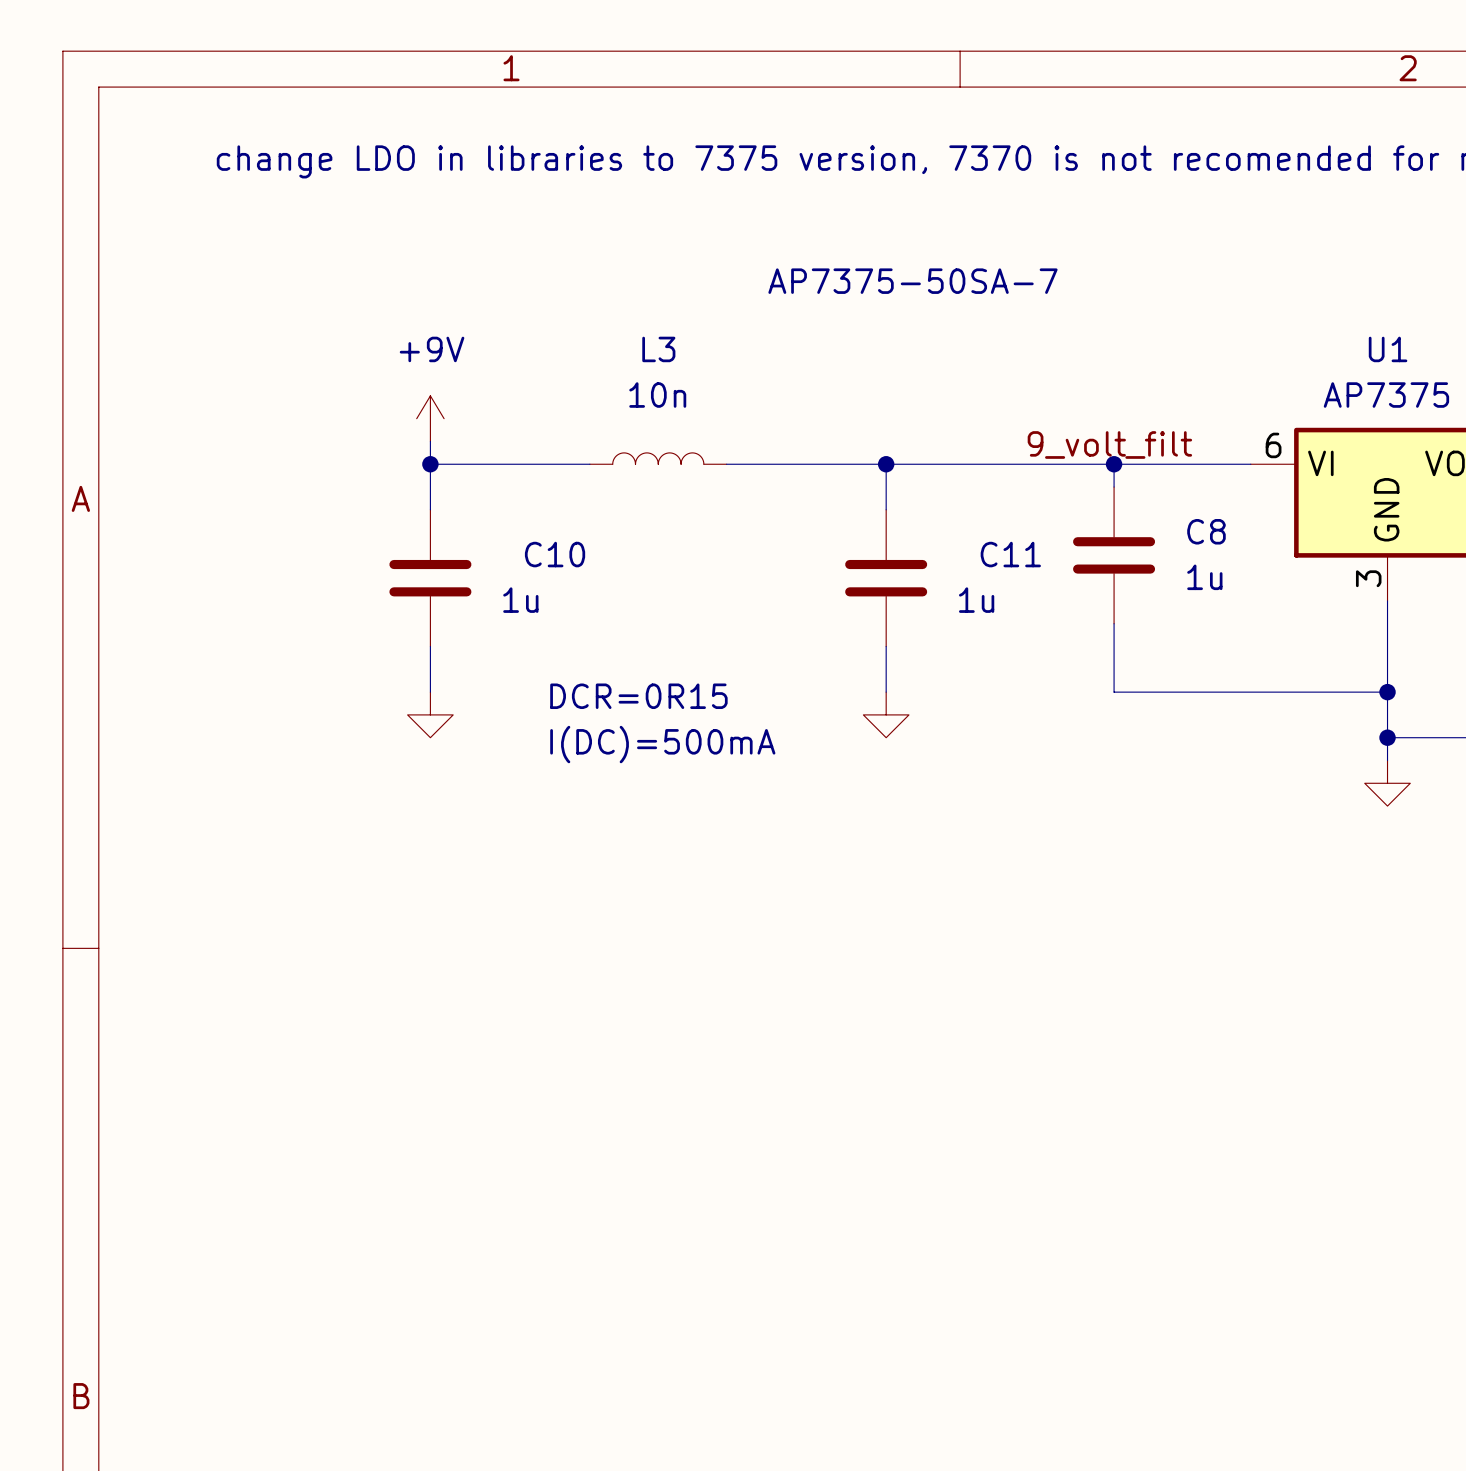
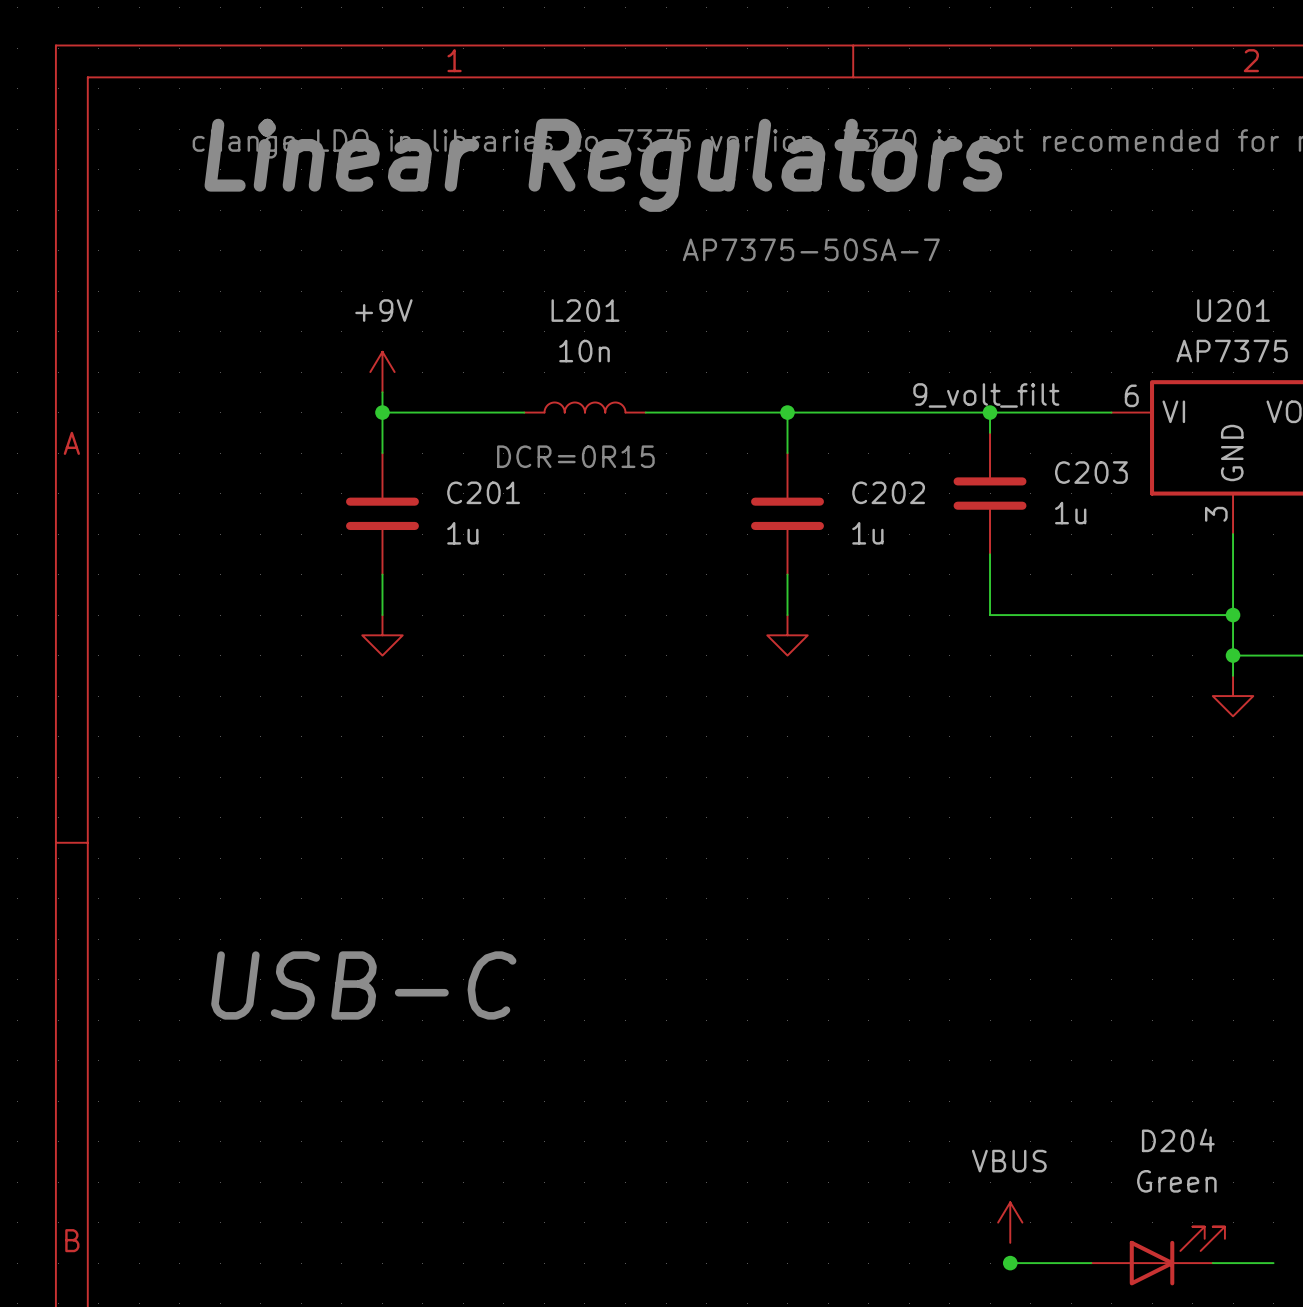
text: none -> Linear Regulators (603, 165)
L3 name: L3 (658, 349) -> L201 (585, 310)
U1 name: U1 (1388, 349) -> U201 (1233, 310)
C8 name: C8 (1206, 531) -> C203 (1091, 472)
C10 name: C10 (555, 554) -> C201 (483, 492)
C11 name: C11 (1010, 554) -> C202 (888, 492)
text position: DCR=0R15 (638, 696) -> DCR=0R15 (575, 456)
text: I(DC)=500mA (662, 744) -> none
text: none -> USB-C (363, 985)
power symbol: none -> VBUS (1010, 1222)
D204: none -> Green (1158, 1256)
wire: none -> (1010, 1263) (1091, 1263)
junction: none -> (1010, 1263)
wire: none -> (1212, 1263) (1273, 1263)

